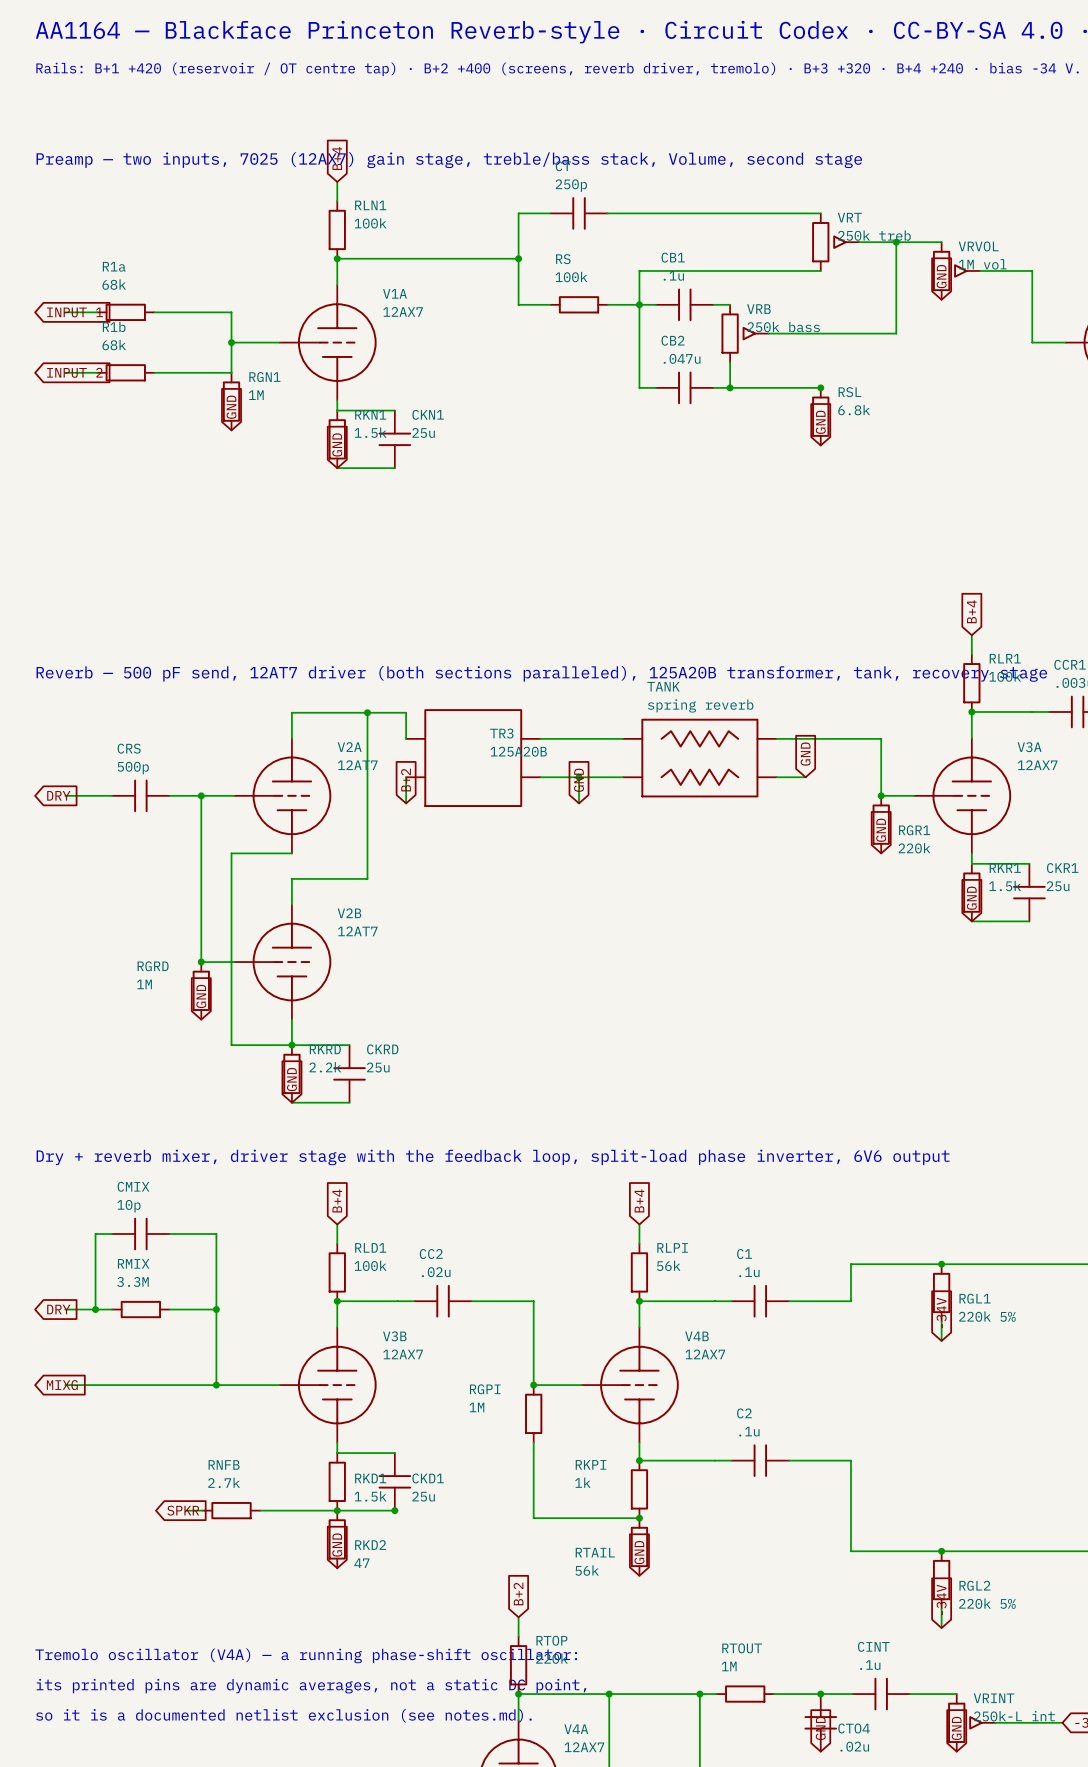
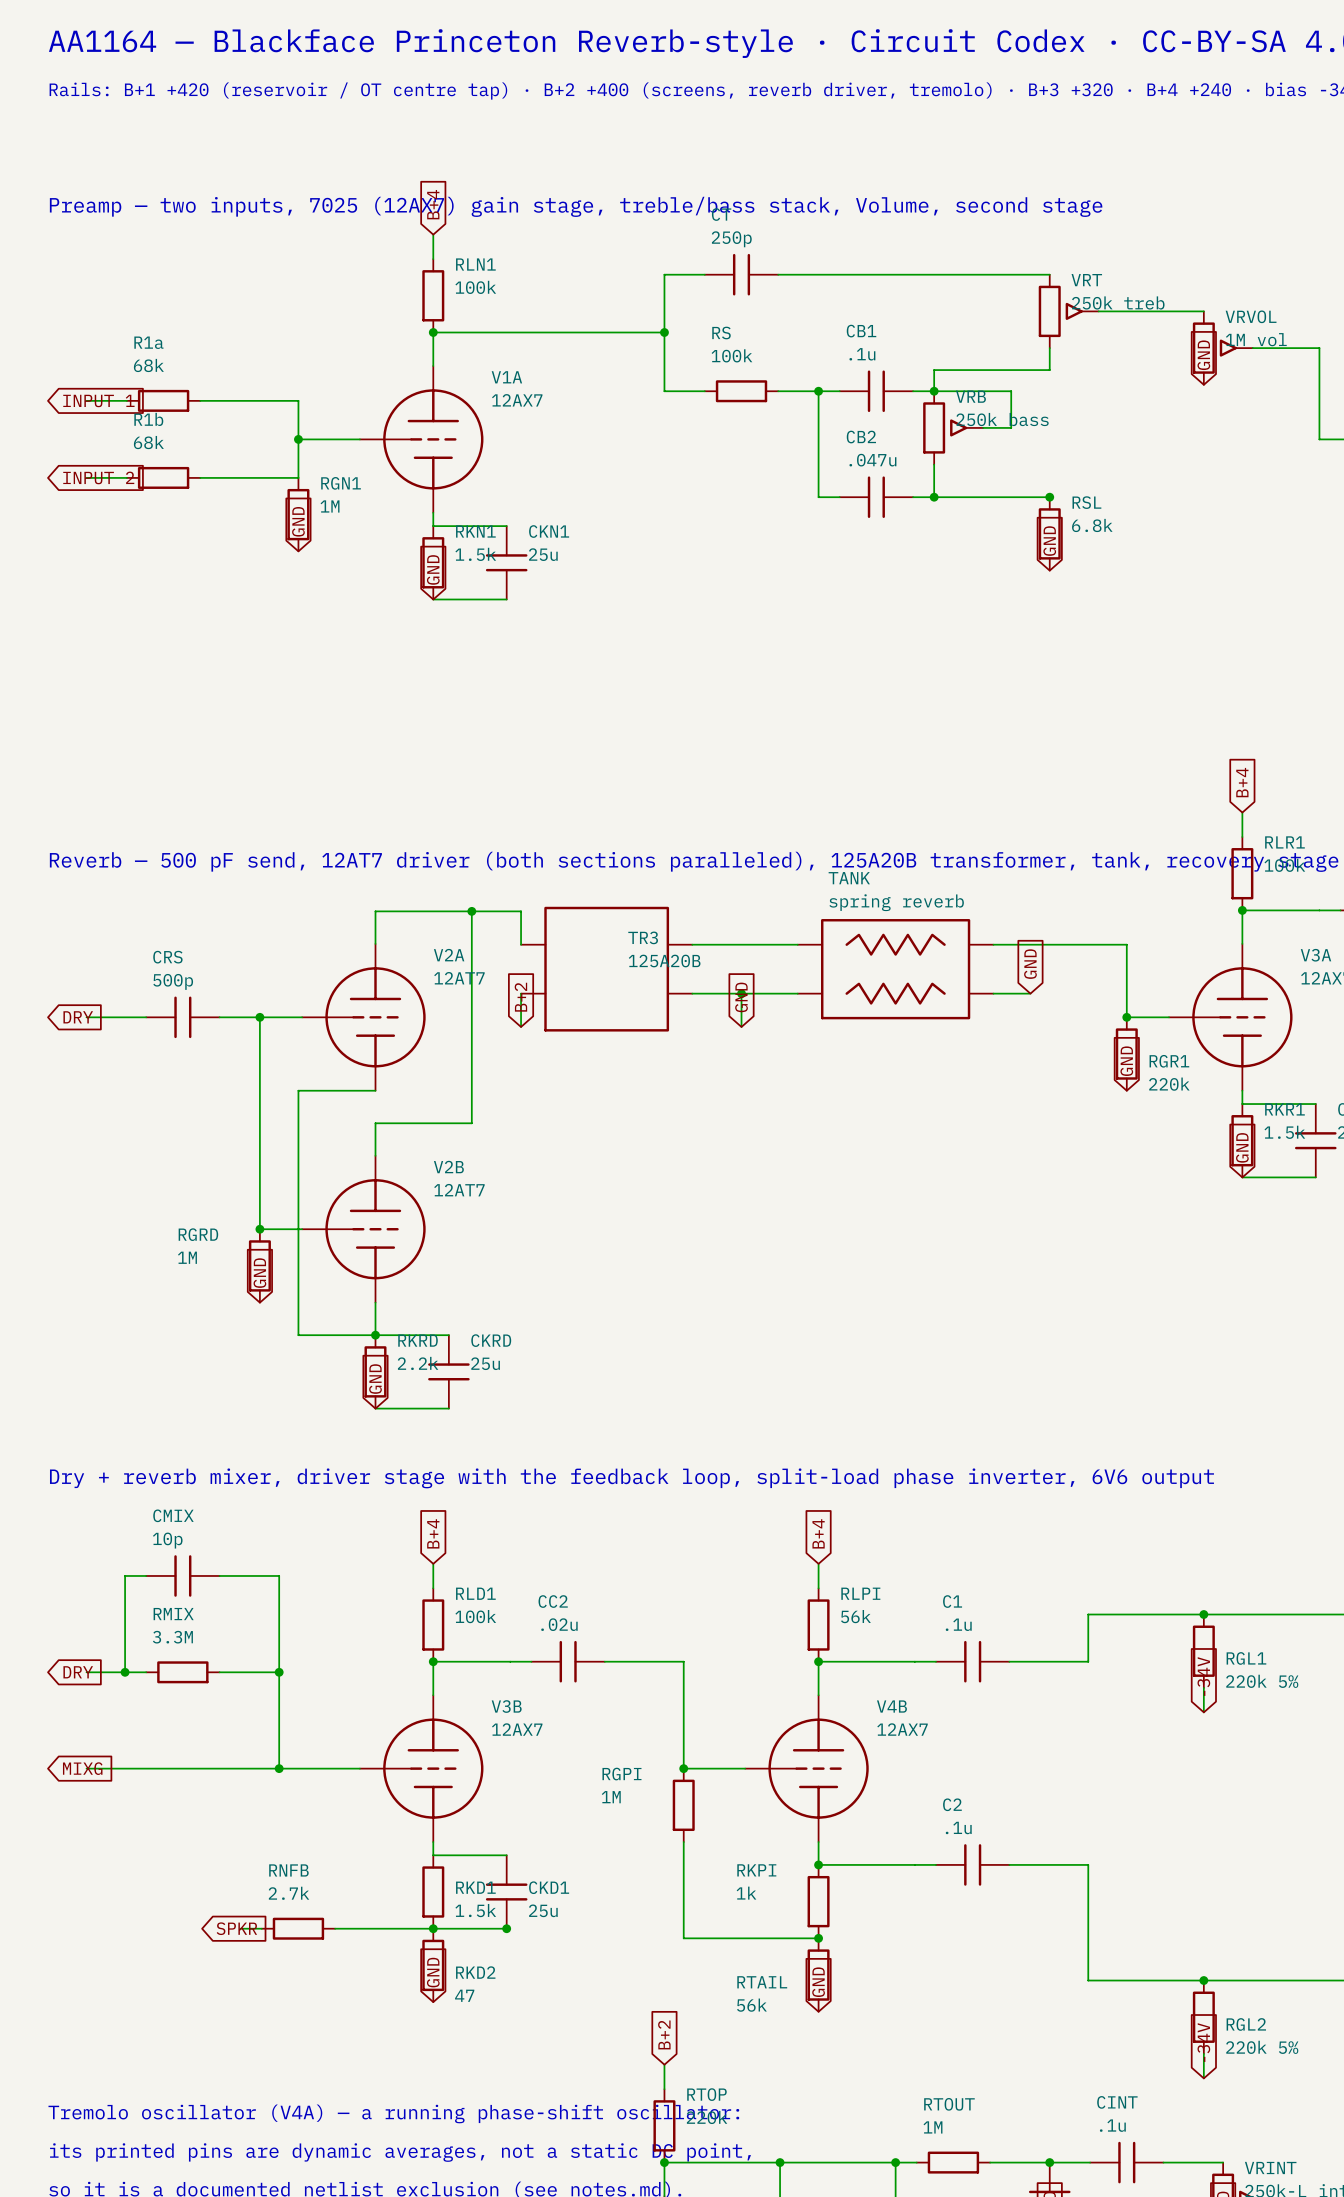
wire: (896, 242) (896, 333) (790, 333) -> (1049, 348) (1049, 370) (934, 370) (934, 391) (1011, 391) (1011, 427)
junction: (896, 242) -> none
wire: (820, 270) (639, 270) (639, 304) -> none
junction: none -> (934, 391)

